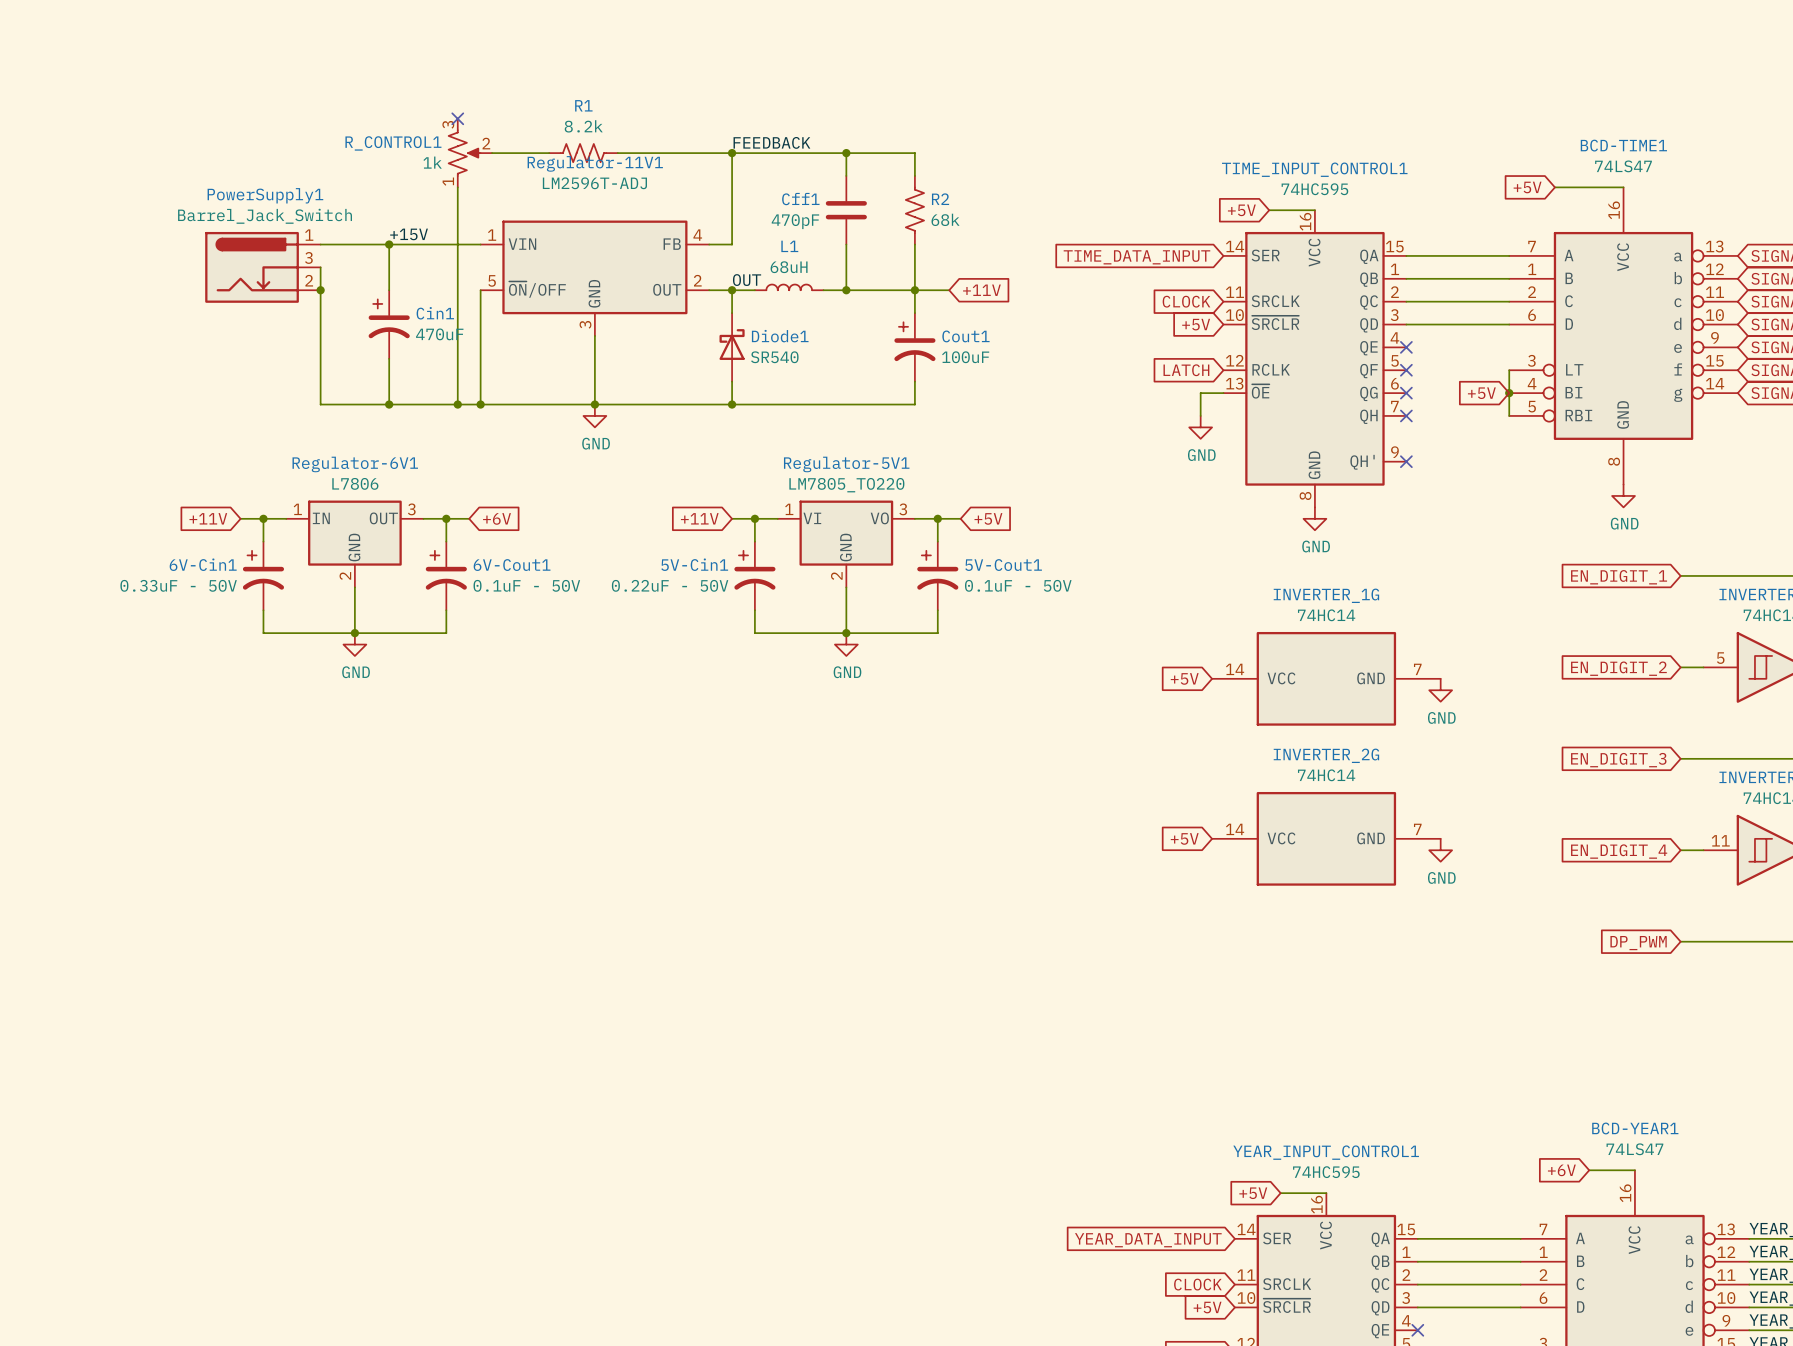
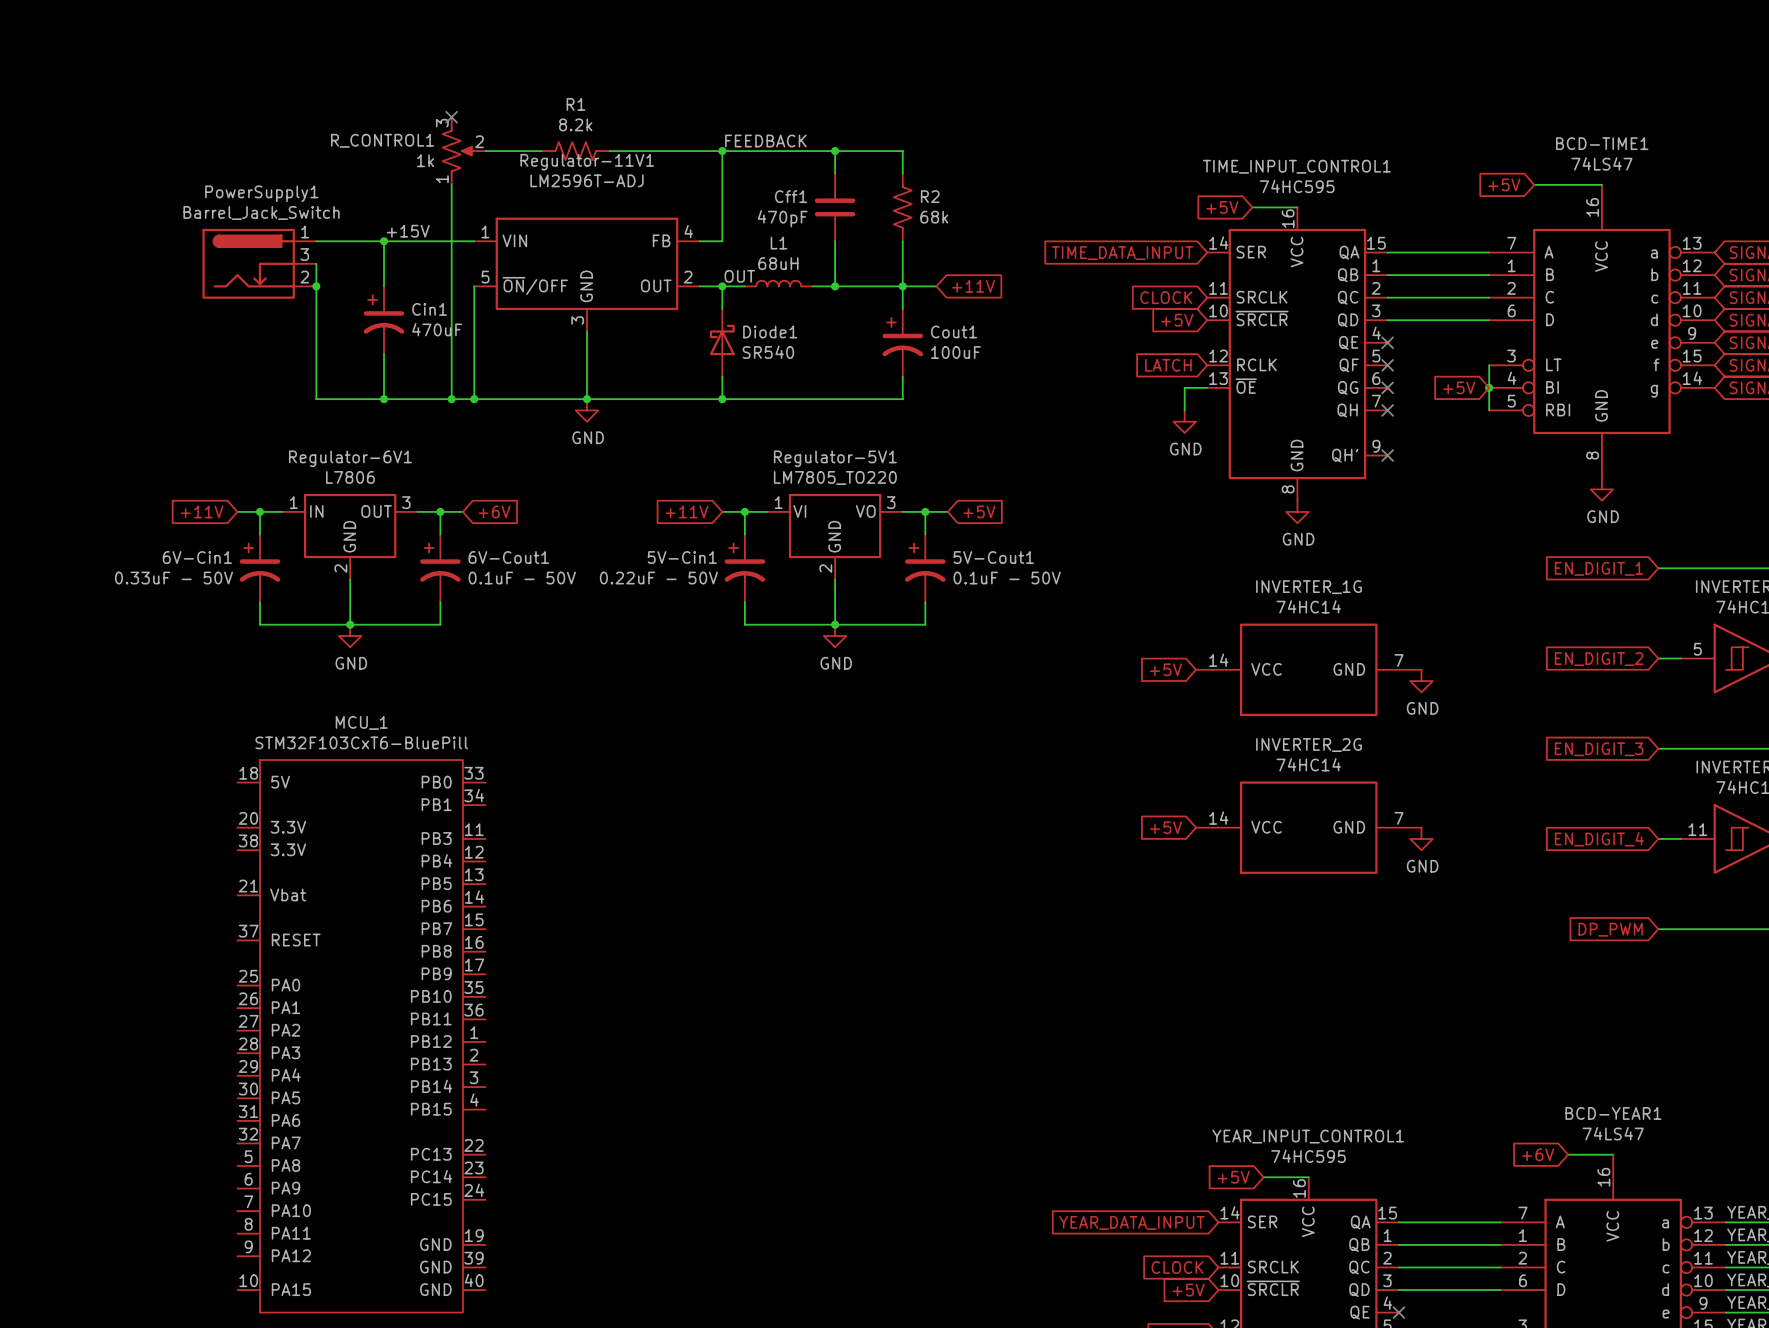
MCU_1: none -> STM32F103CxT6-BluePill (361, 1036)

